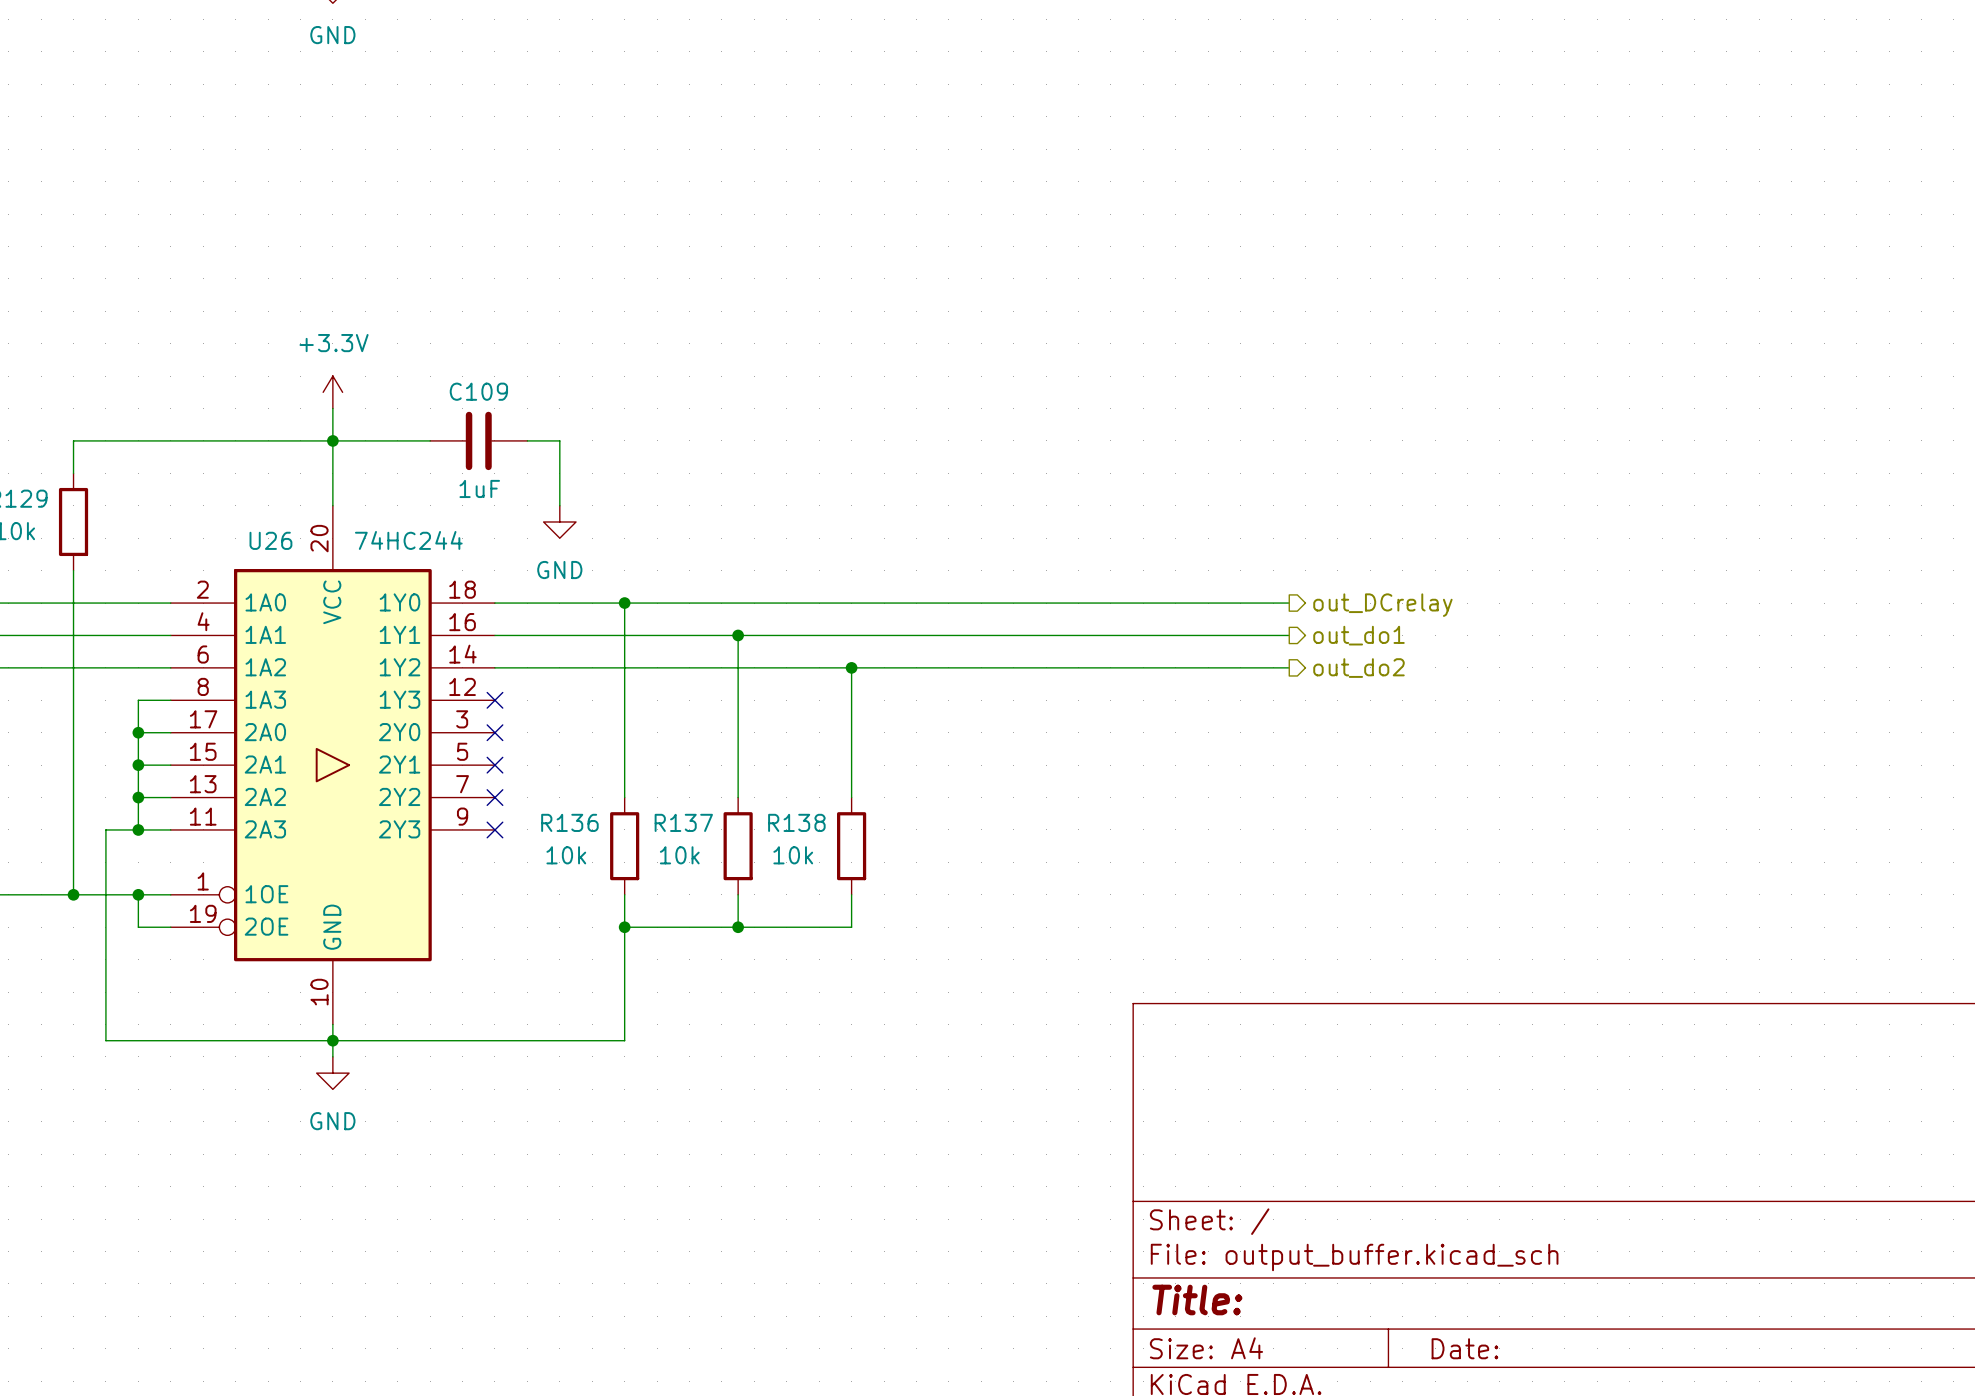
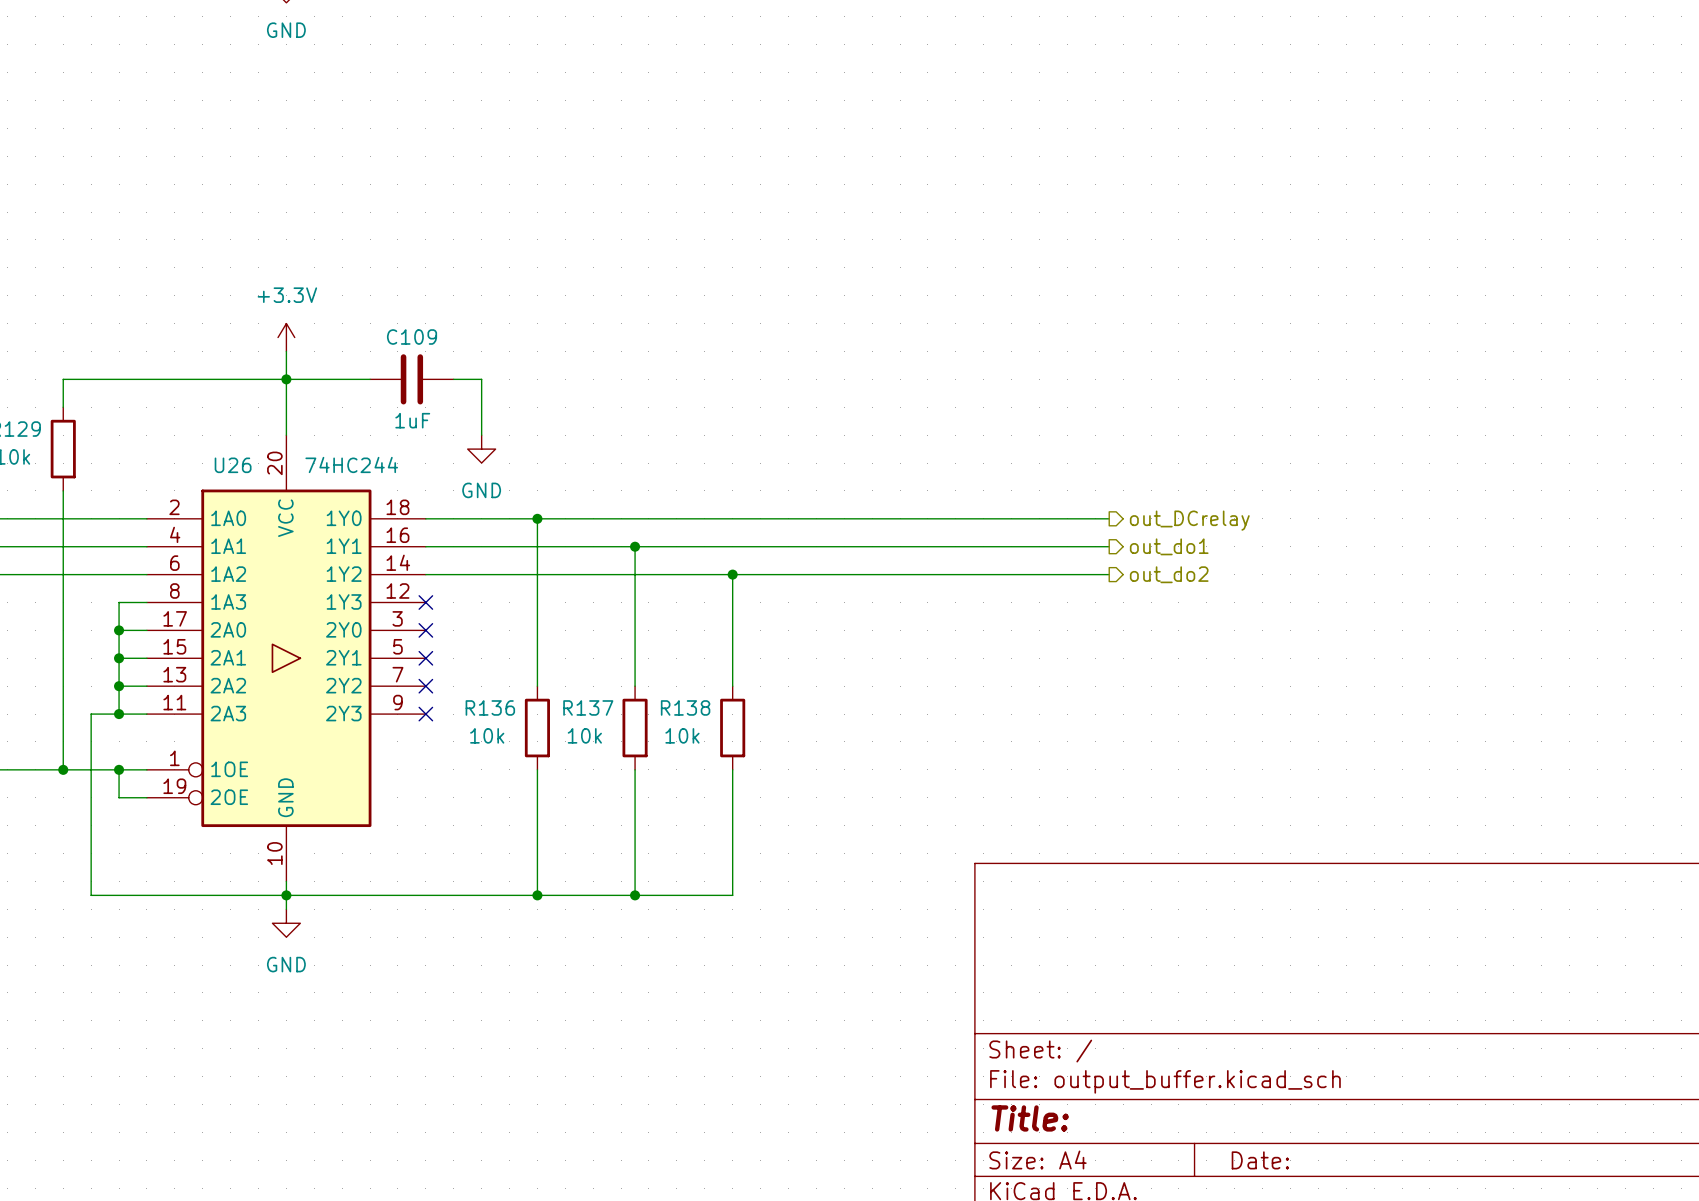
wire: (624, 927) (851, 927) -> (537, 895) (732, 895) (732, 797)
junction: (624, 927) -> none
wire: none -> (635, 797) (635, 895)
junction: (738, 927) -> none
junction: none -> (537, 895)
junction: none -> (635, 895)

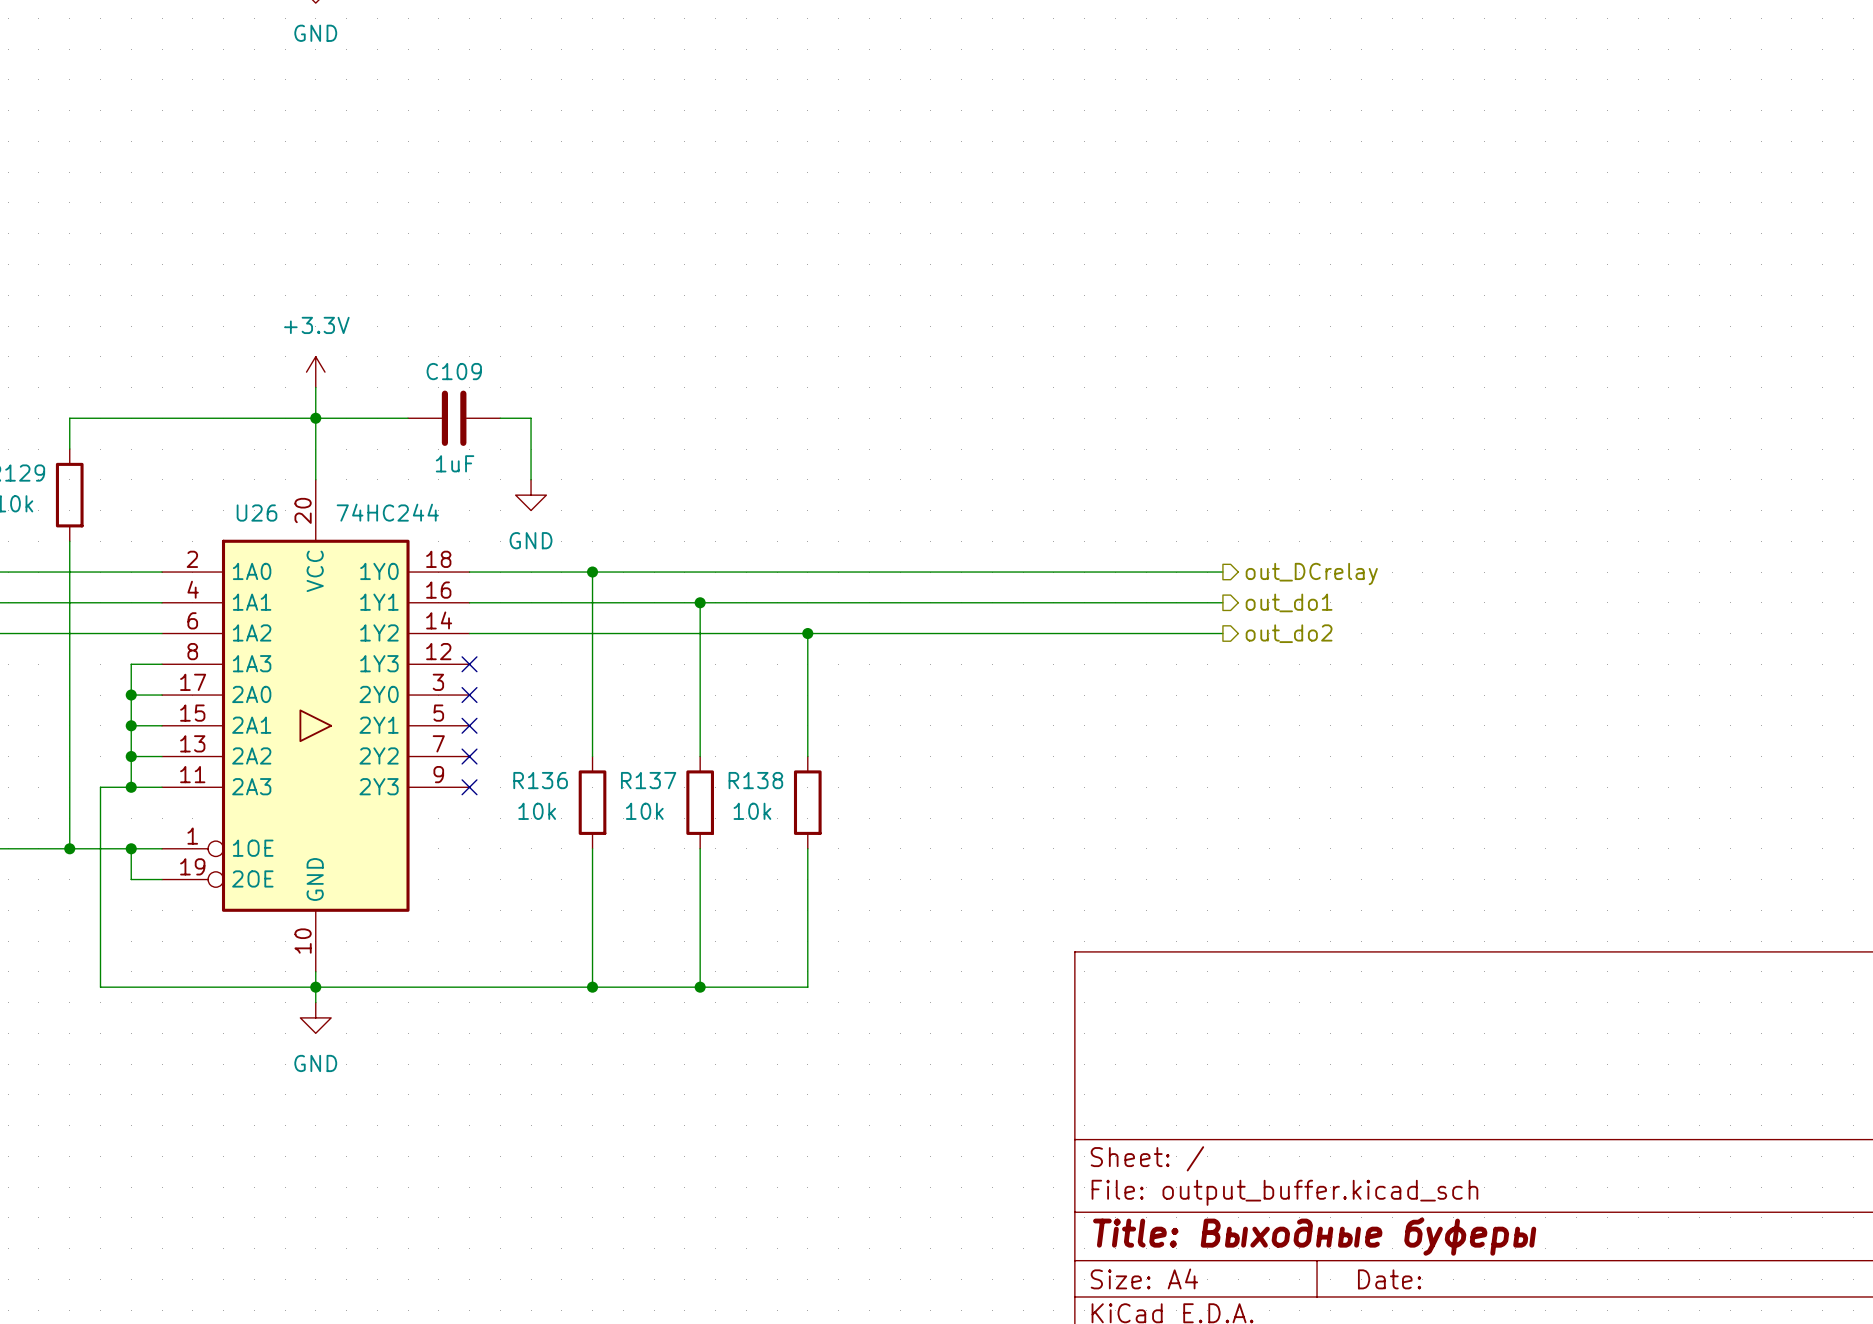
title block: Title: (1030, 1118) -> Title: Выходные буферы (1314, 1236)

